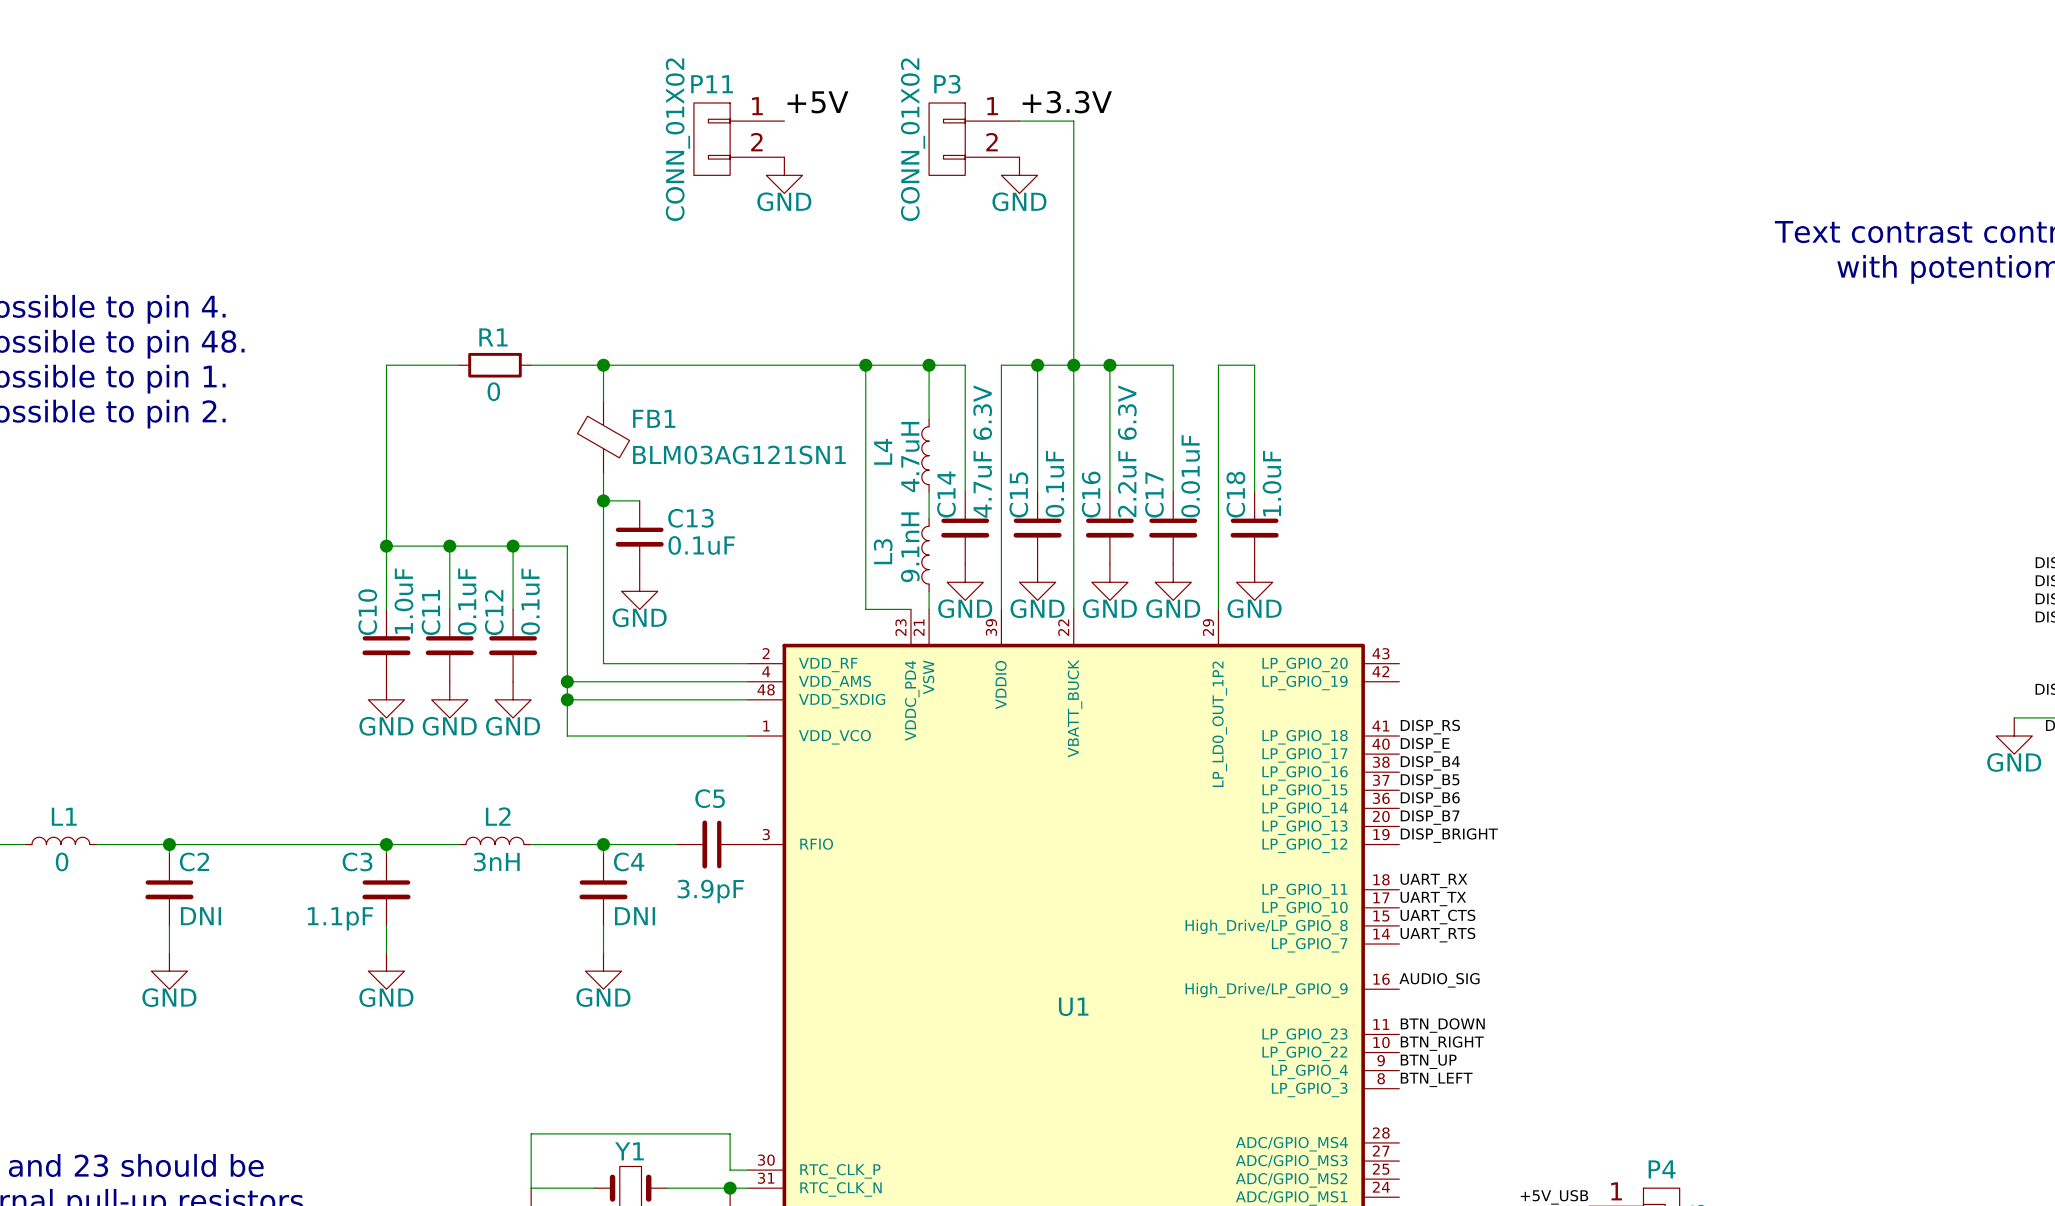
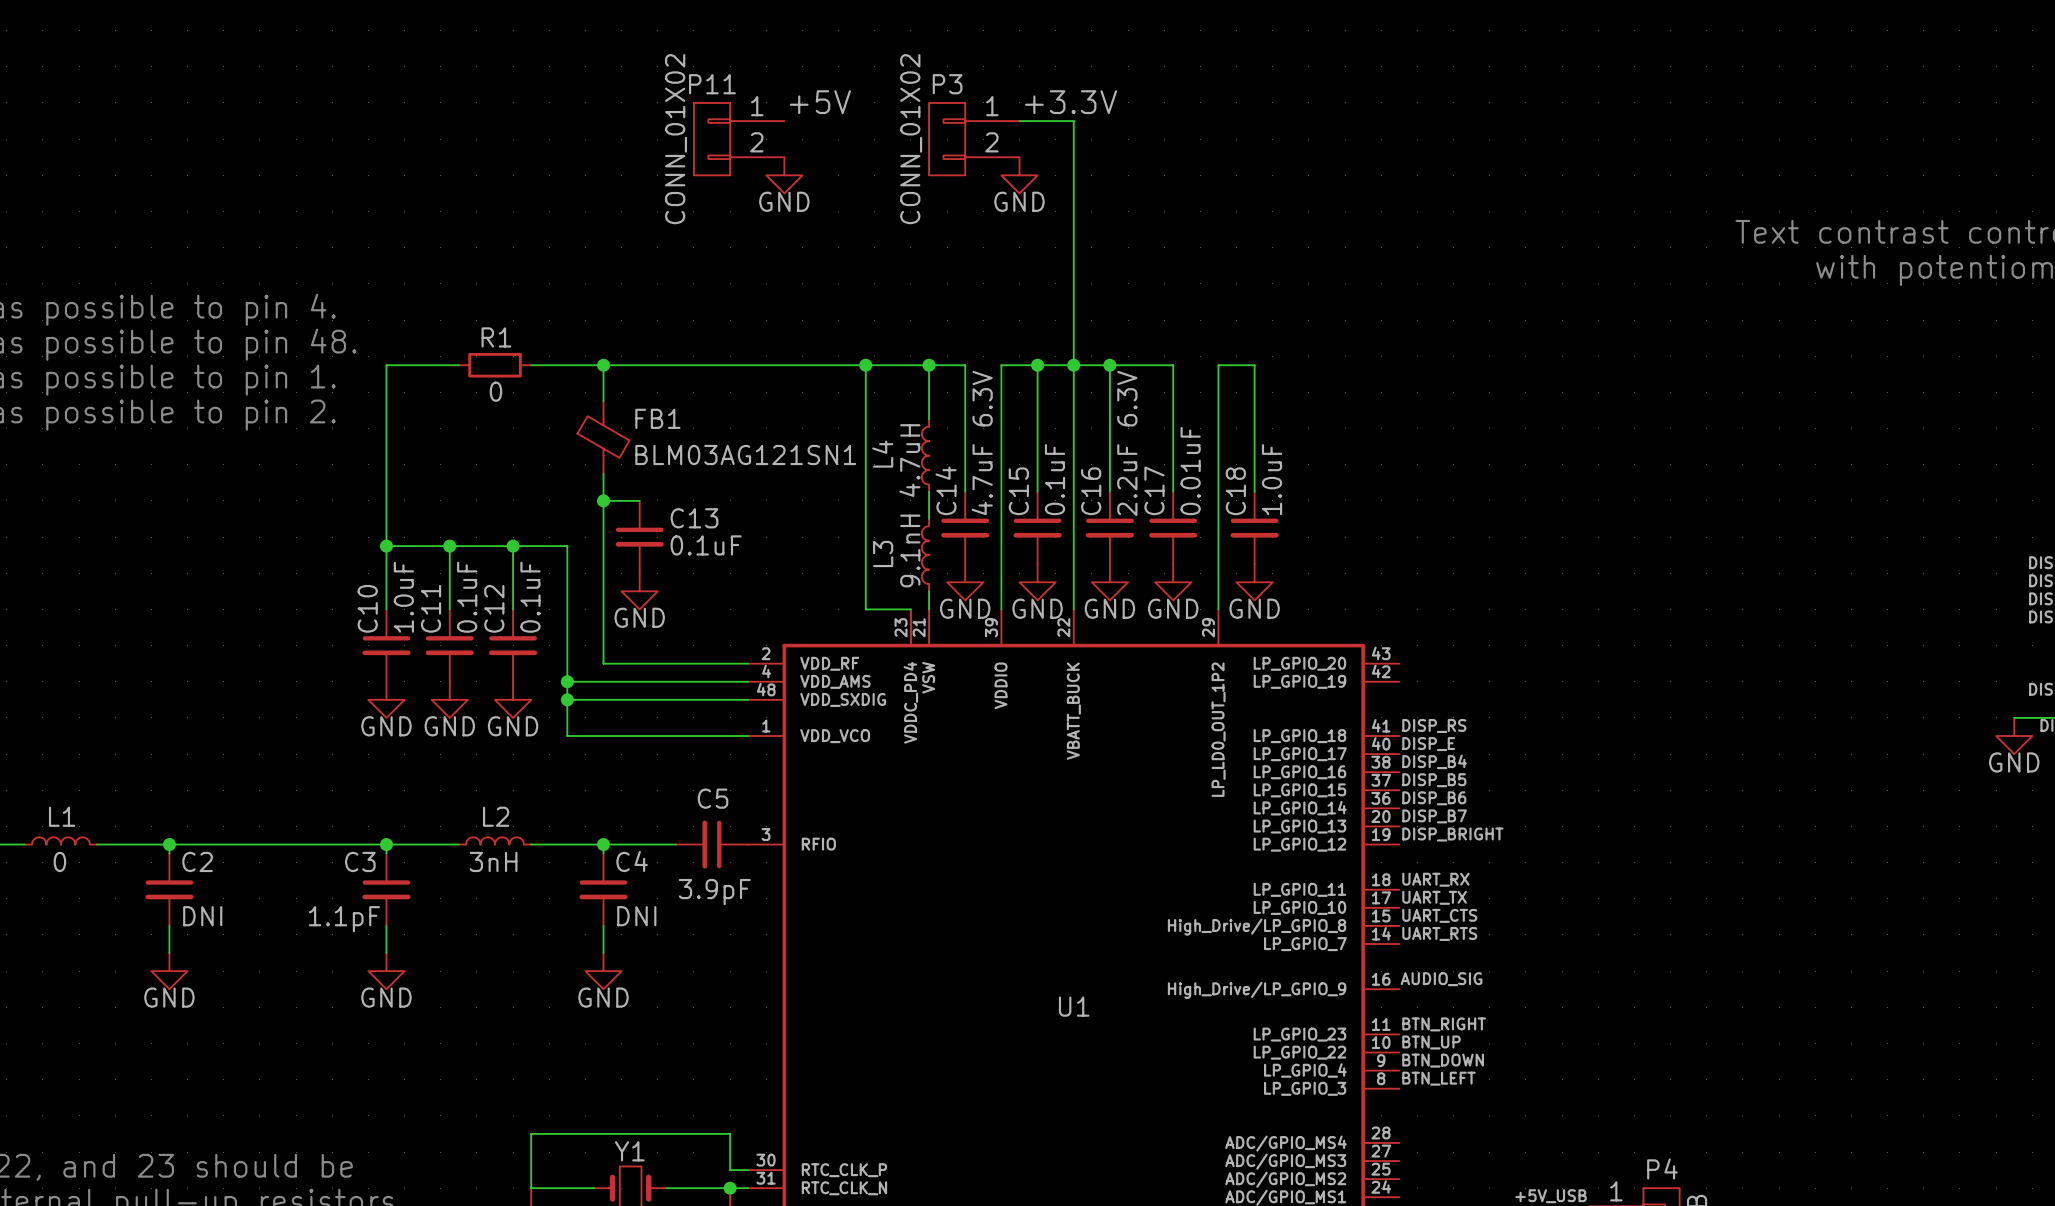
label: BTN_DOWN (1442, 1025) -> BTN_RIGHT (1444, 1024)
label: BTN_RIGHT (1442, 1043) -> BTN_UP (1431, 1042)
label: BTN_UP (1428, 1061) -> BTN_DOWN (1443, 1060)

